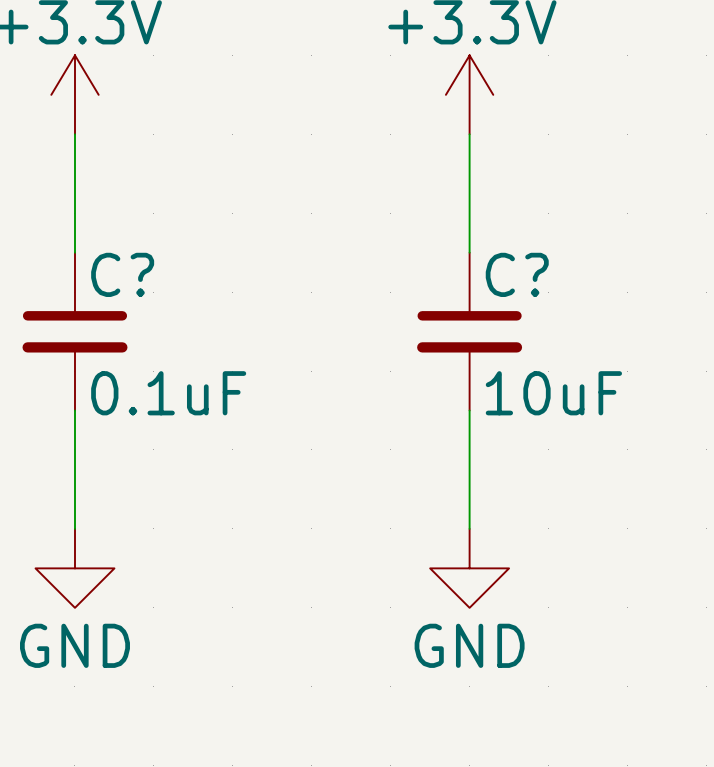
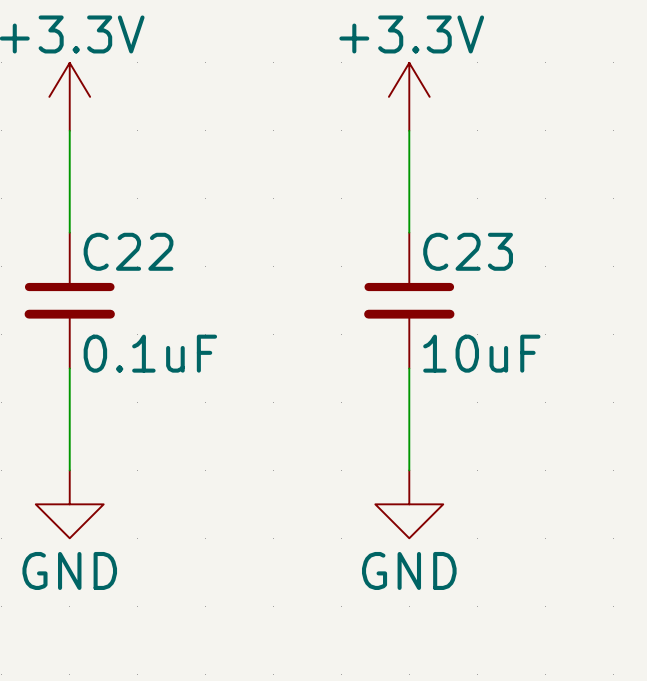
C? name: C? (122, 274) -> C22 (128, 251)
C? name: C? (517, 274) -> C23 (468, 251)

